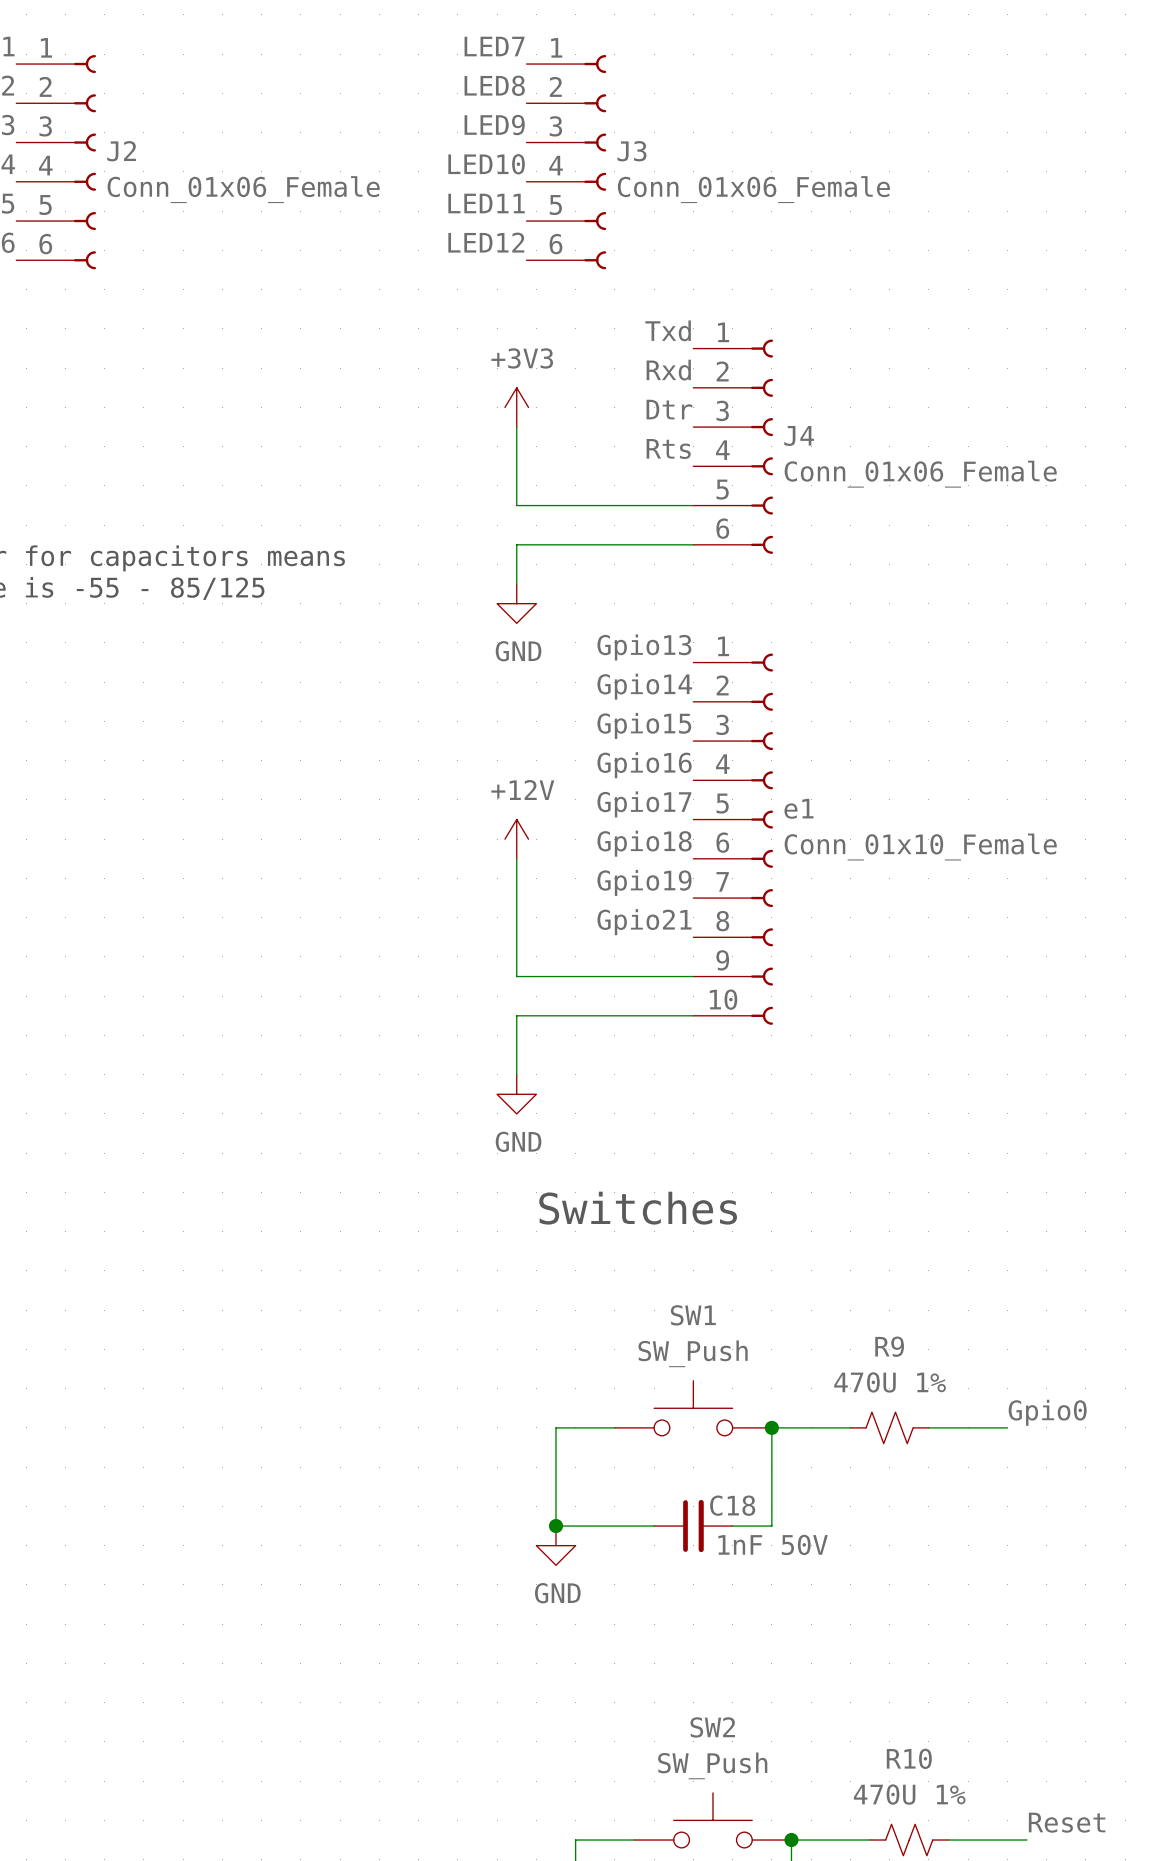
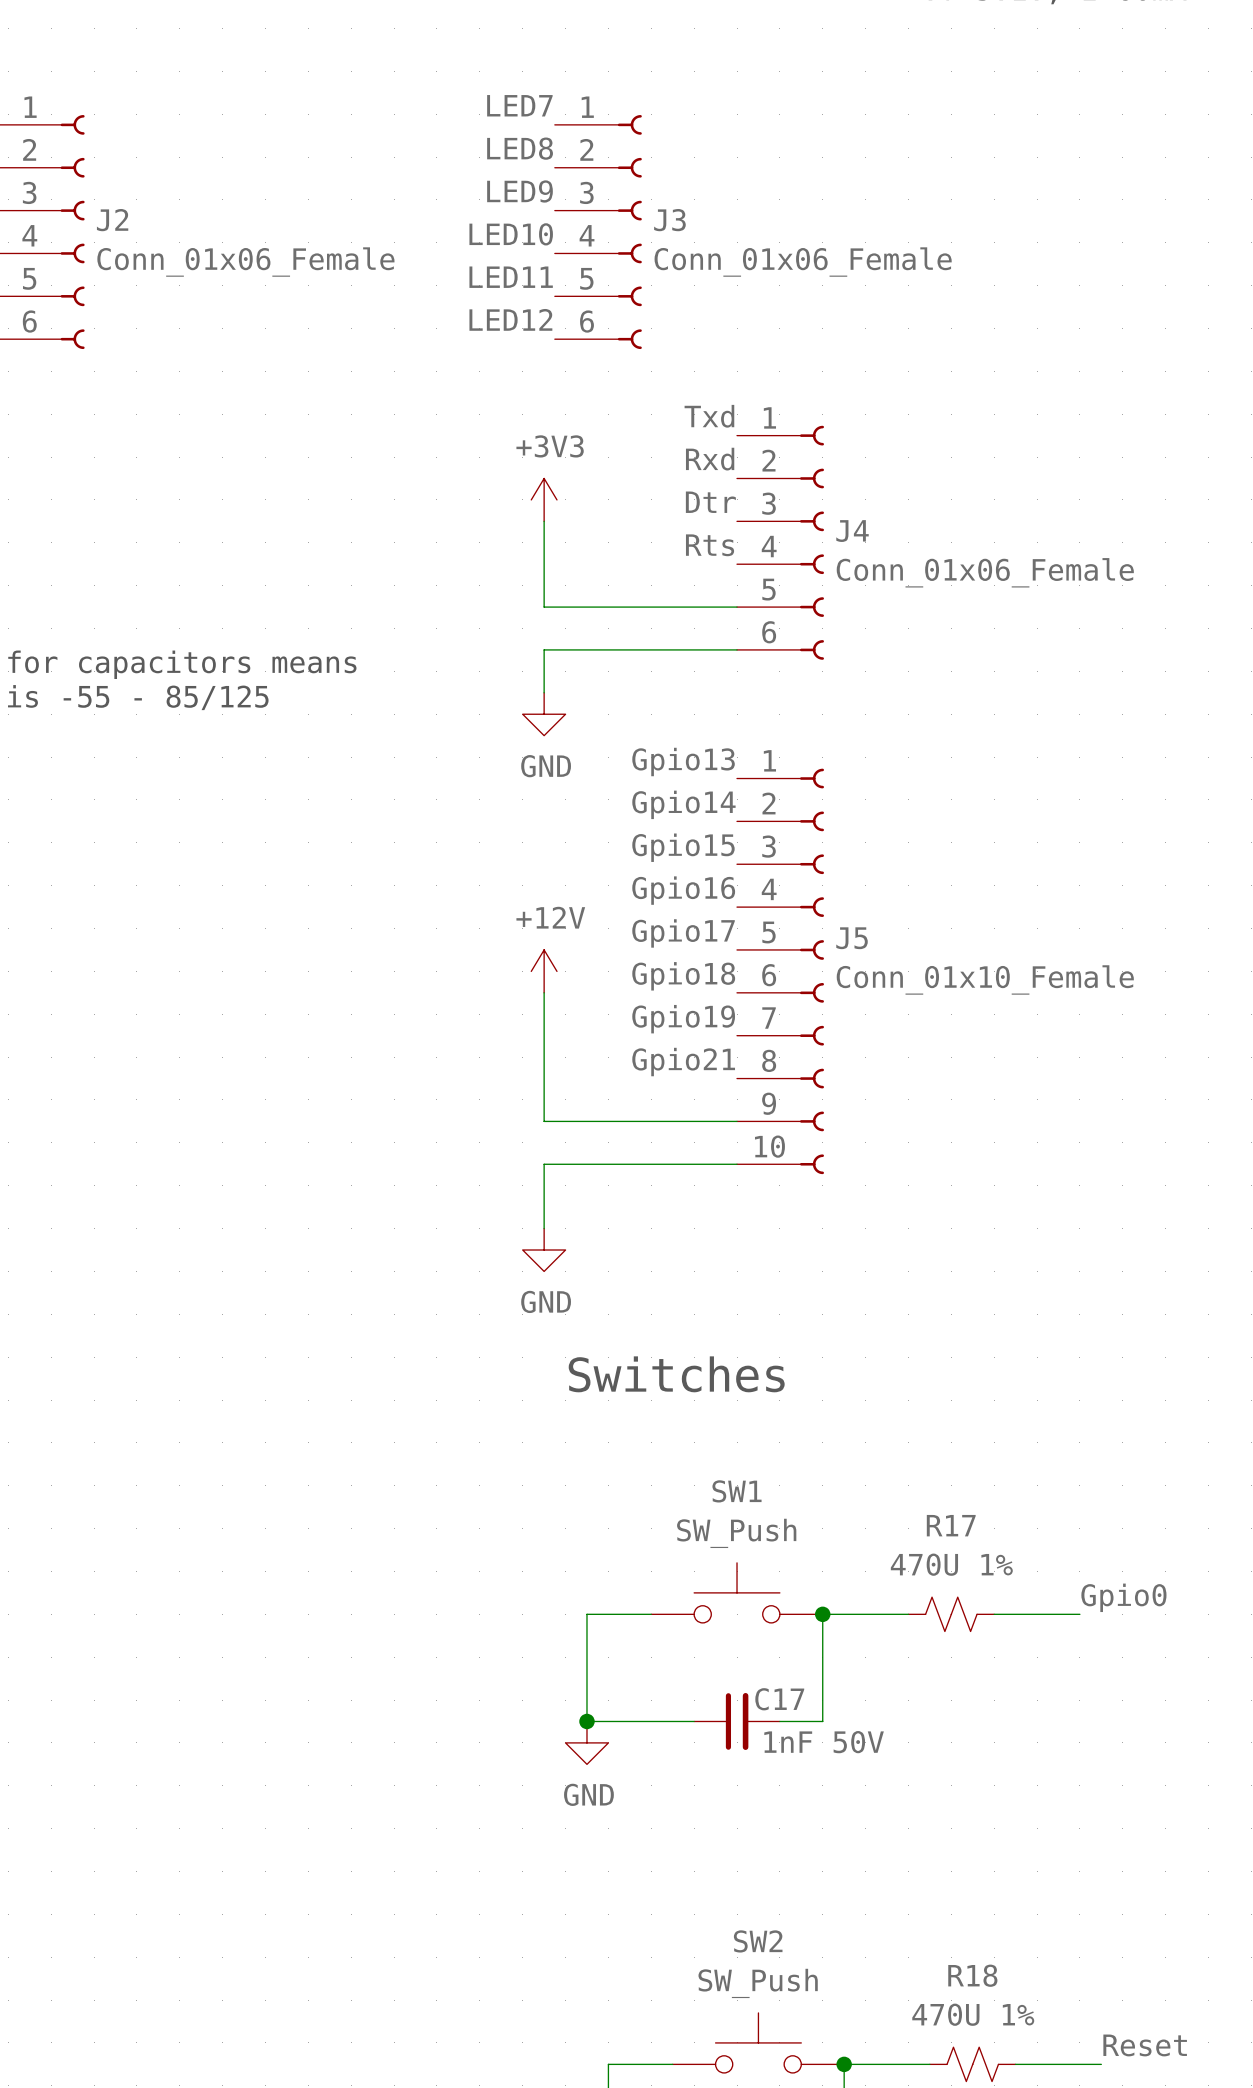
e1 name: e1 (798, 808) -> J5 (852, 938)
R9 name: R9 (889, 1346) -> R17 (951, 1525)
C18 name: C18 (732, 1505) -> C17 (779, 1699)
R10 name: R10 (909, 1758) -> R18 (972, 1975)

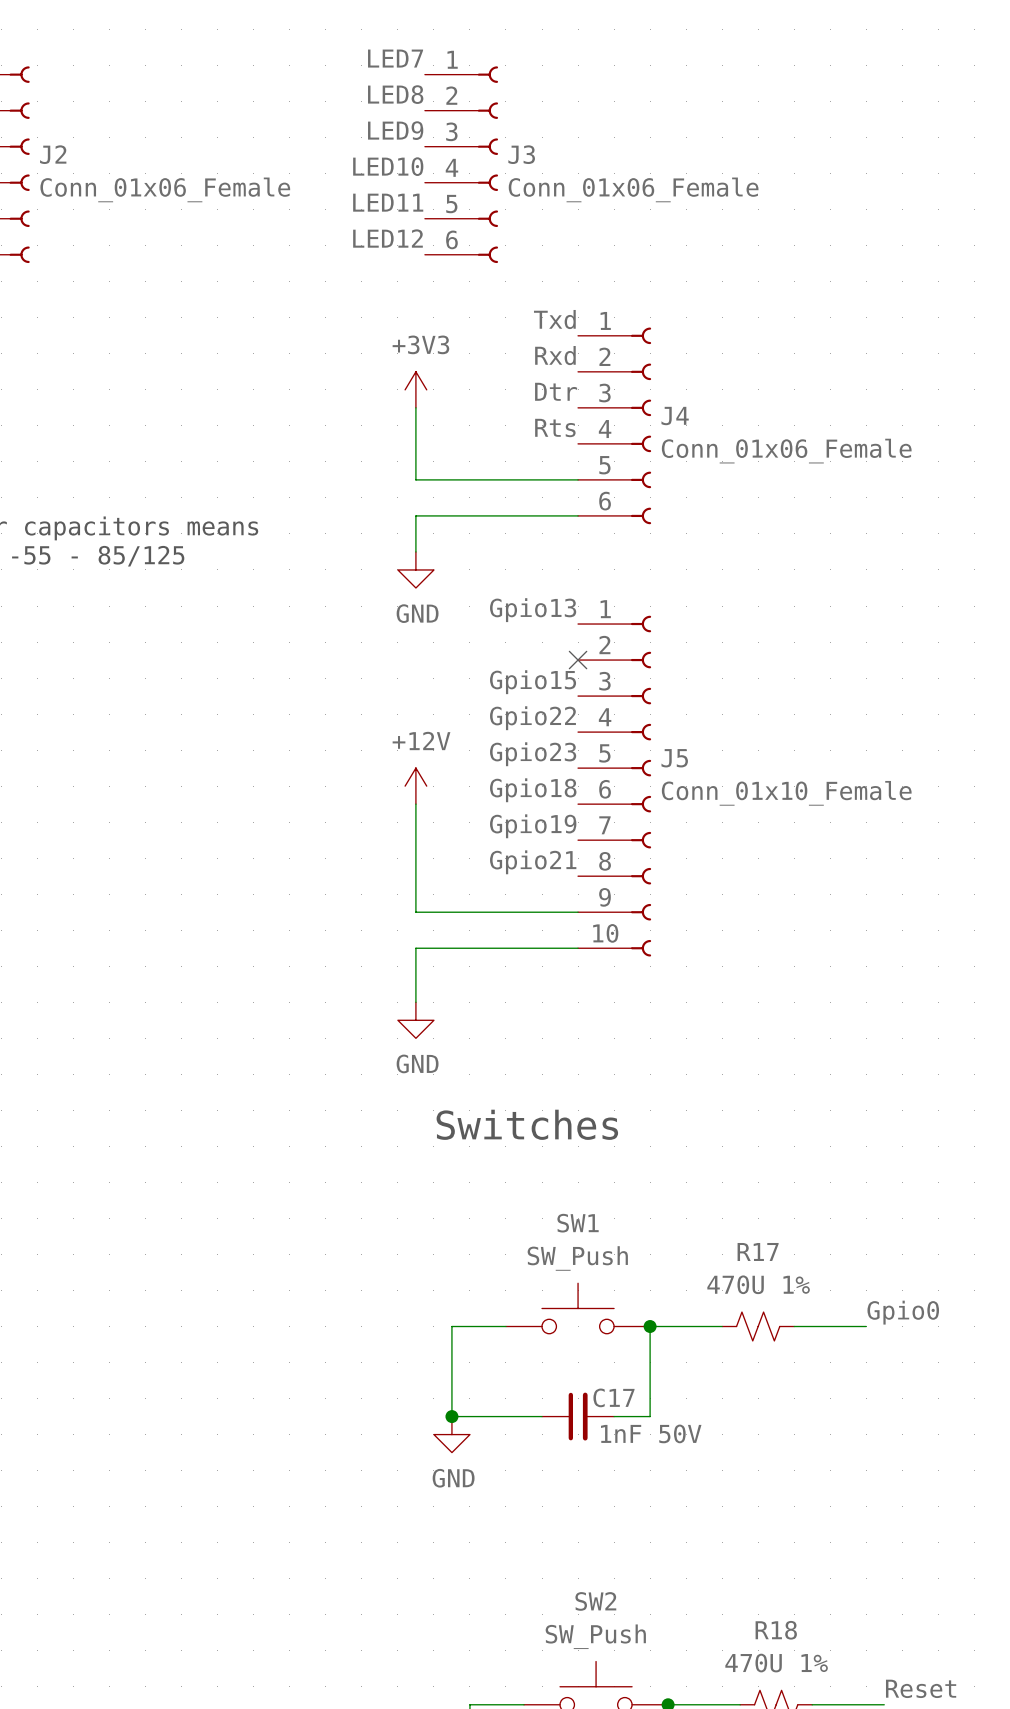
label: Gpio14 (683, 804) -> none
no-connect mark: none -> (578, 660)
label: Gpio16 (683, 890) -> Gpio22 (532, 718)
label: Gpio17 (683, 933) -> Gpio23 (533, 754)

